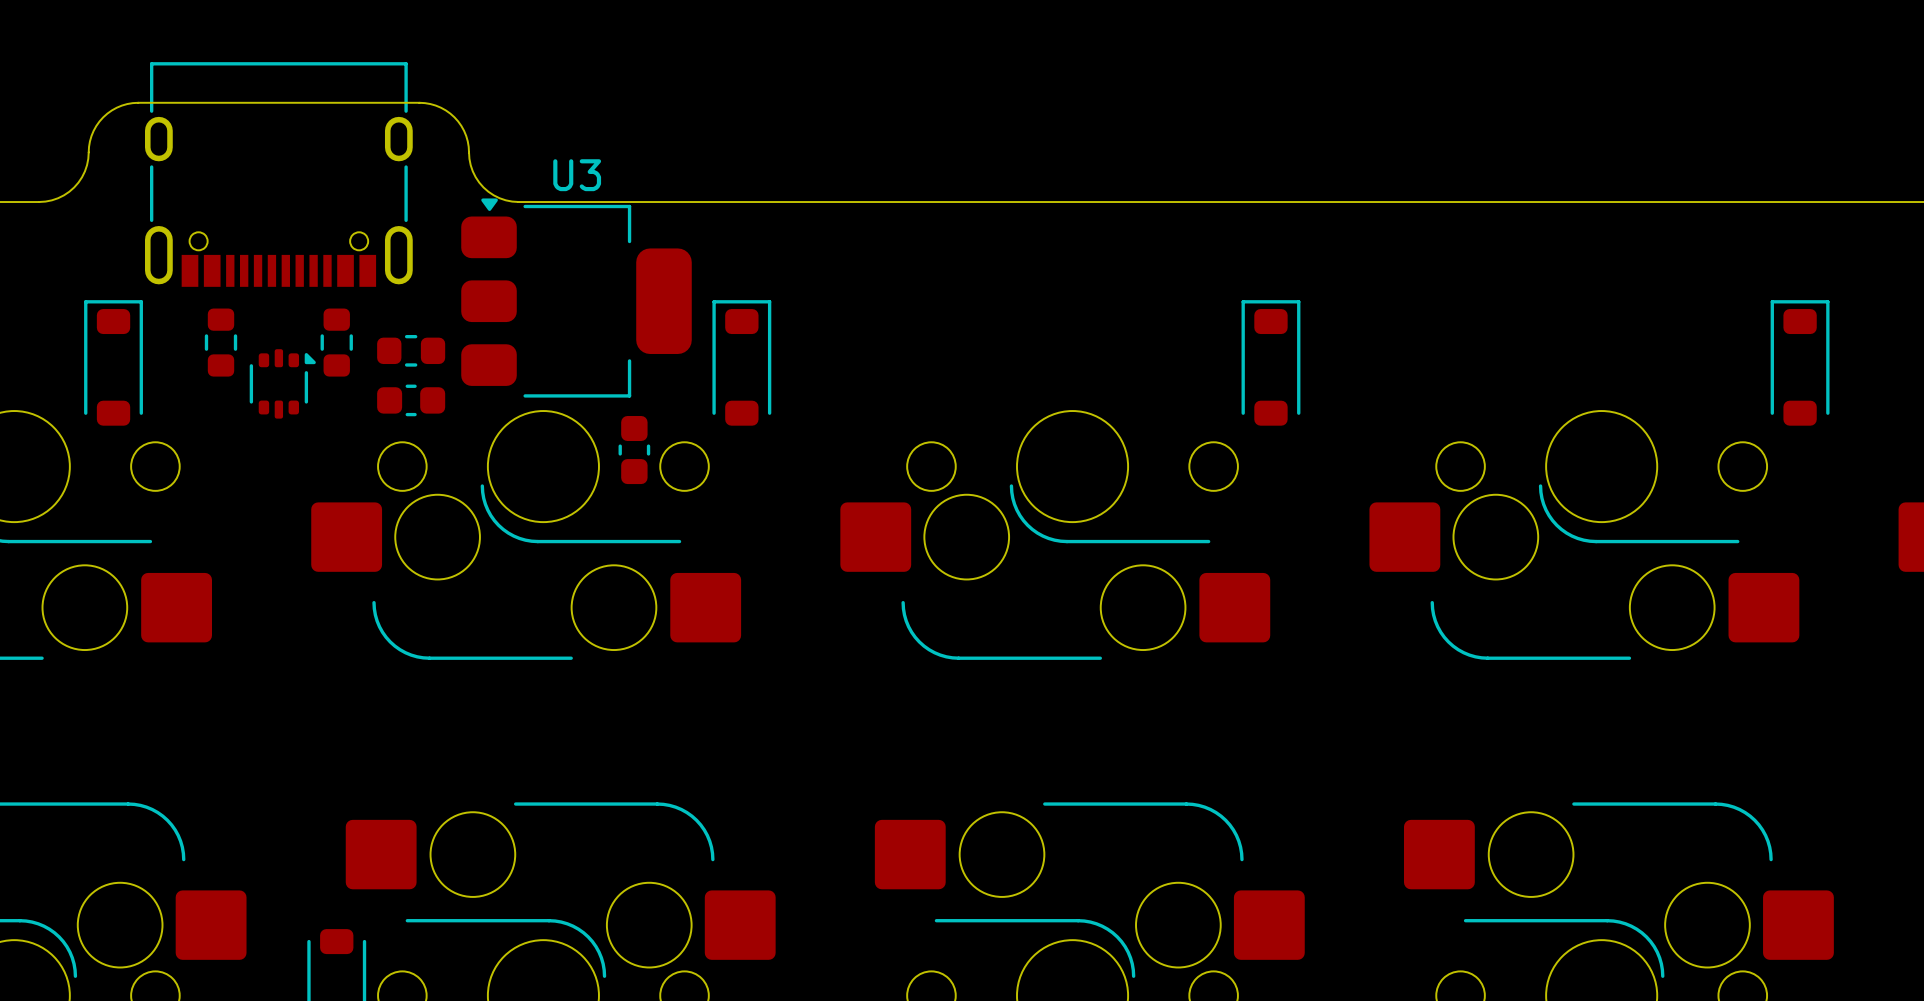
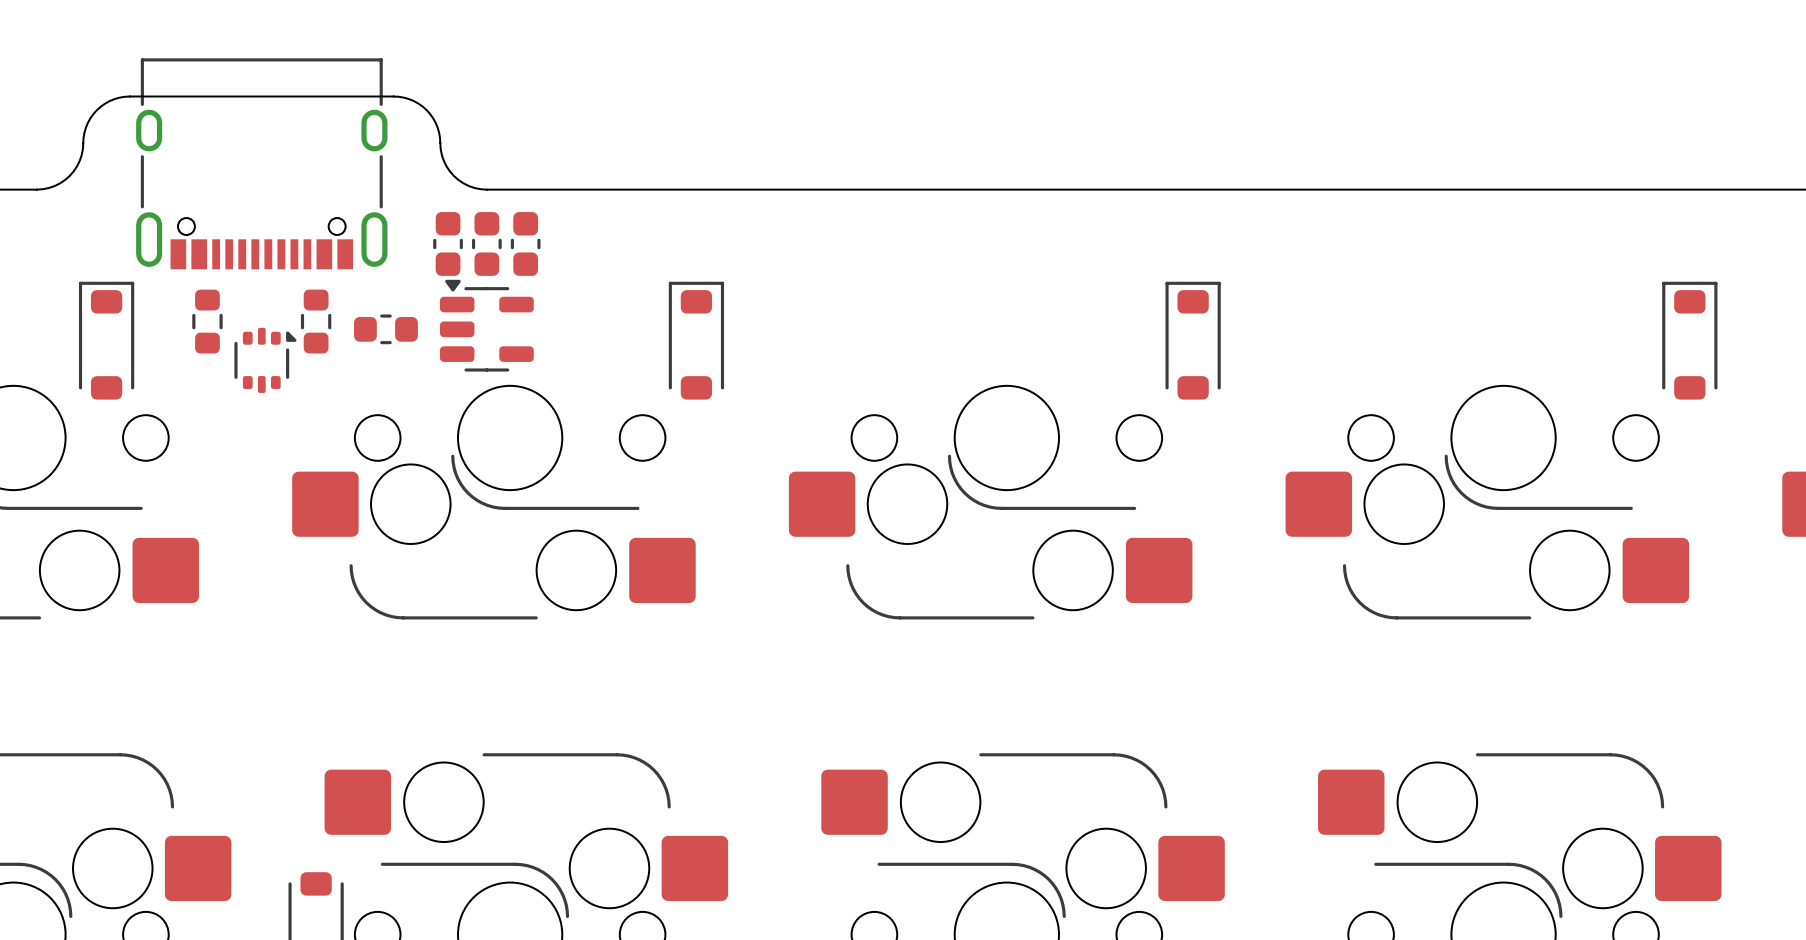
part: none -> (448, 243)
part: none -> (486, 243)
part: none -> (525, 243)
U3: (576, 298) -> none
part: none -> (486, 325)
part: (411, 400) -> none
part: (634, 450) -> none

